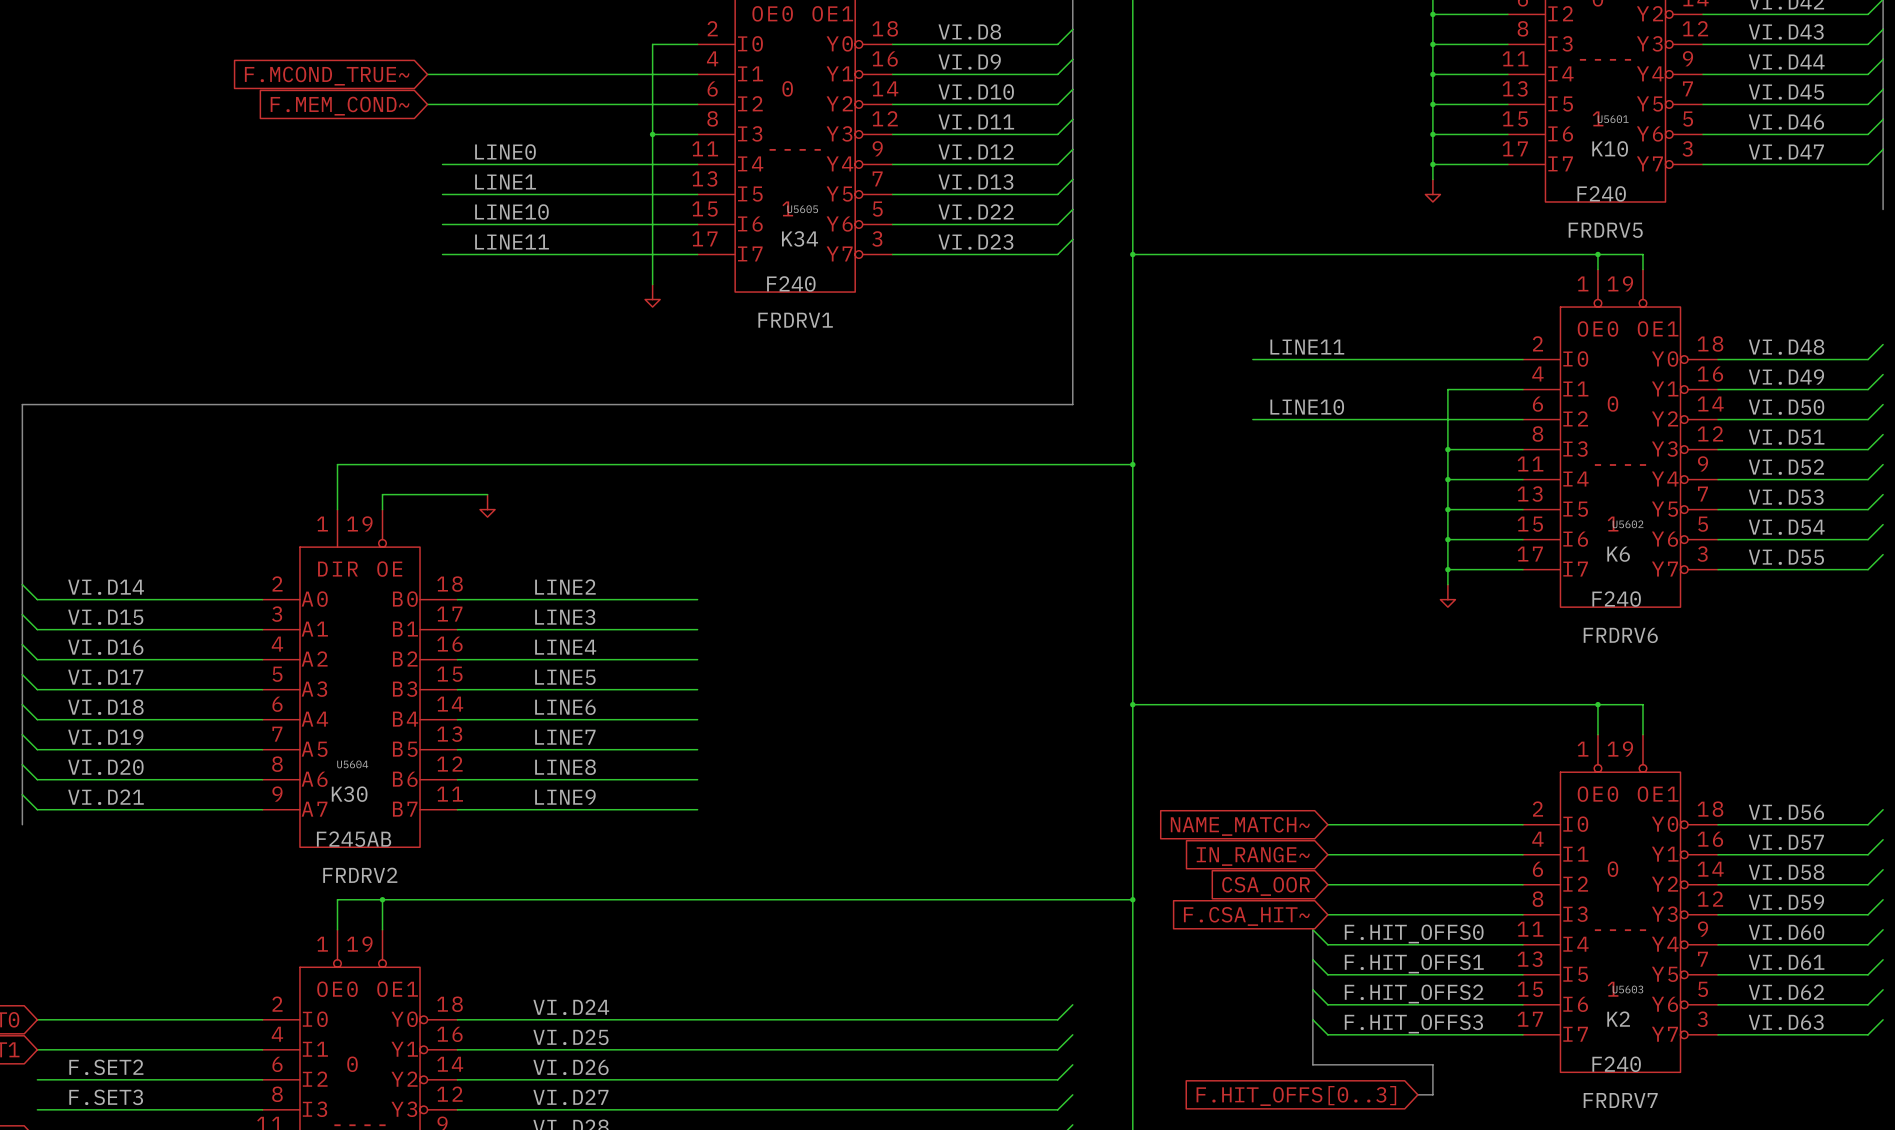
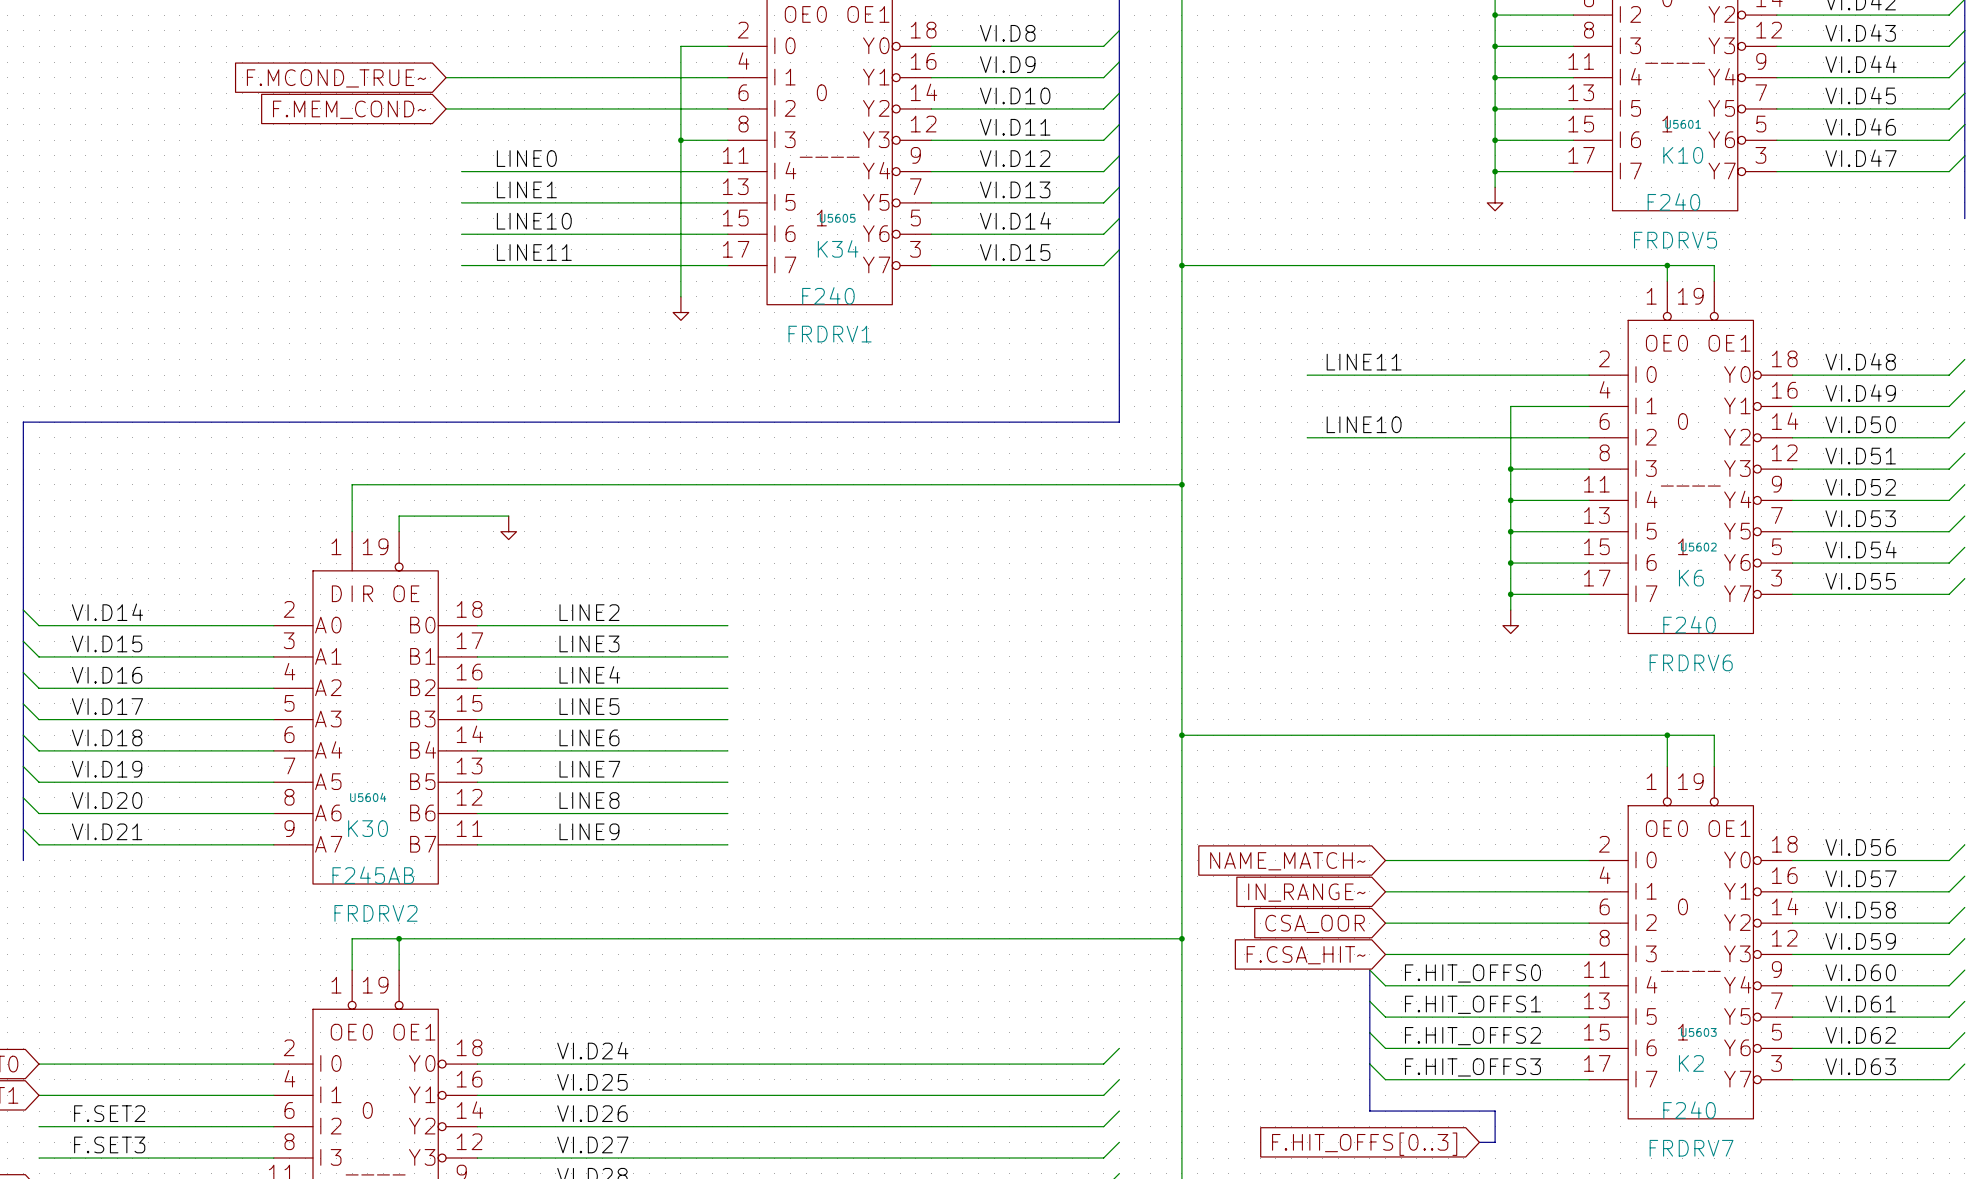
label: VI.D22 (976, 211) -> VI.D14 (1015, 220)
label: VI.D23 (975, 242) -> VI.D15 (1015, 252)

